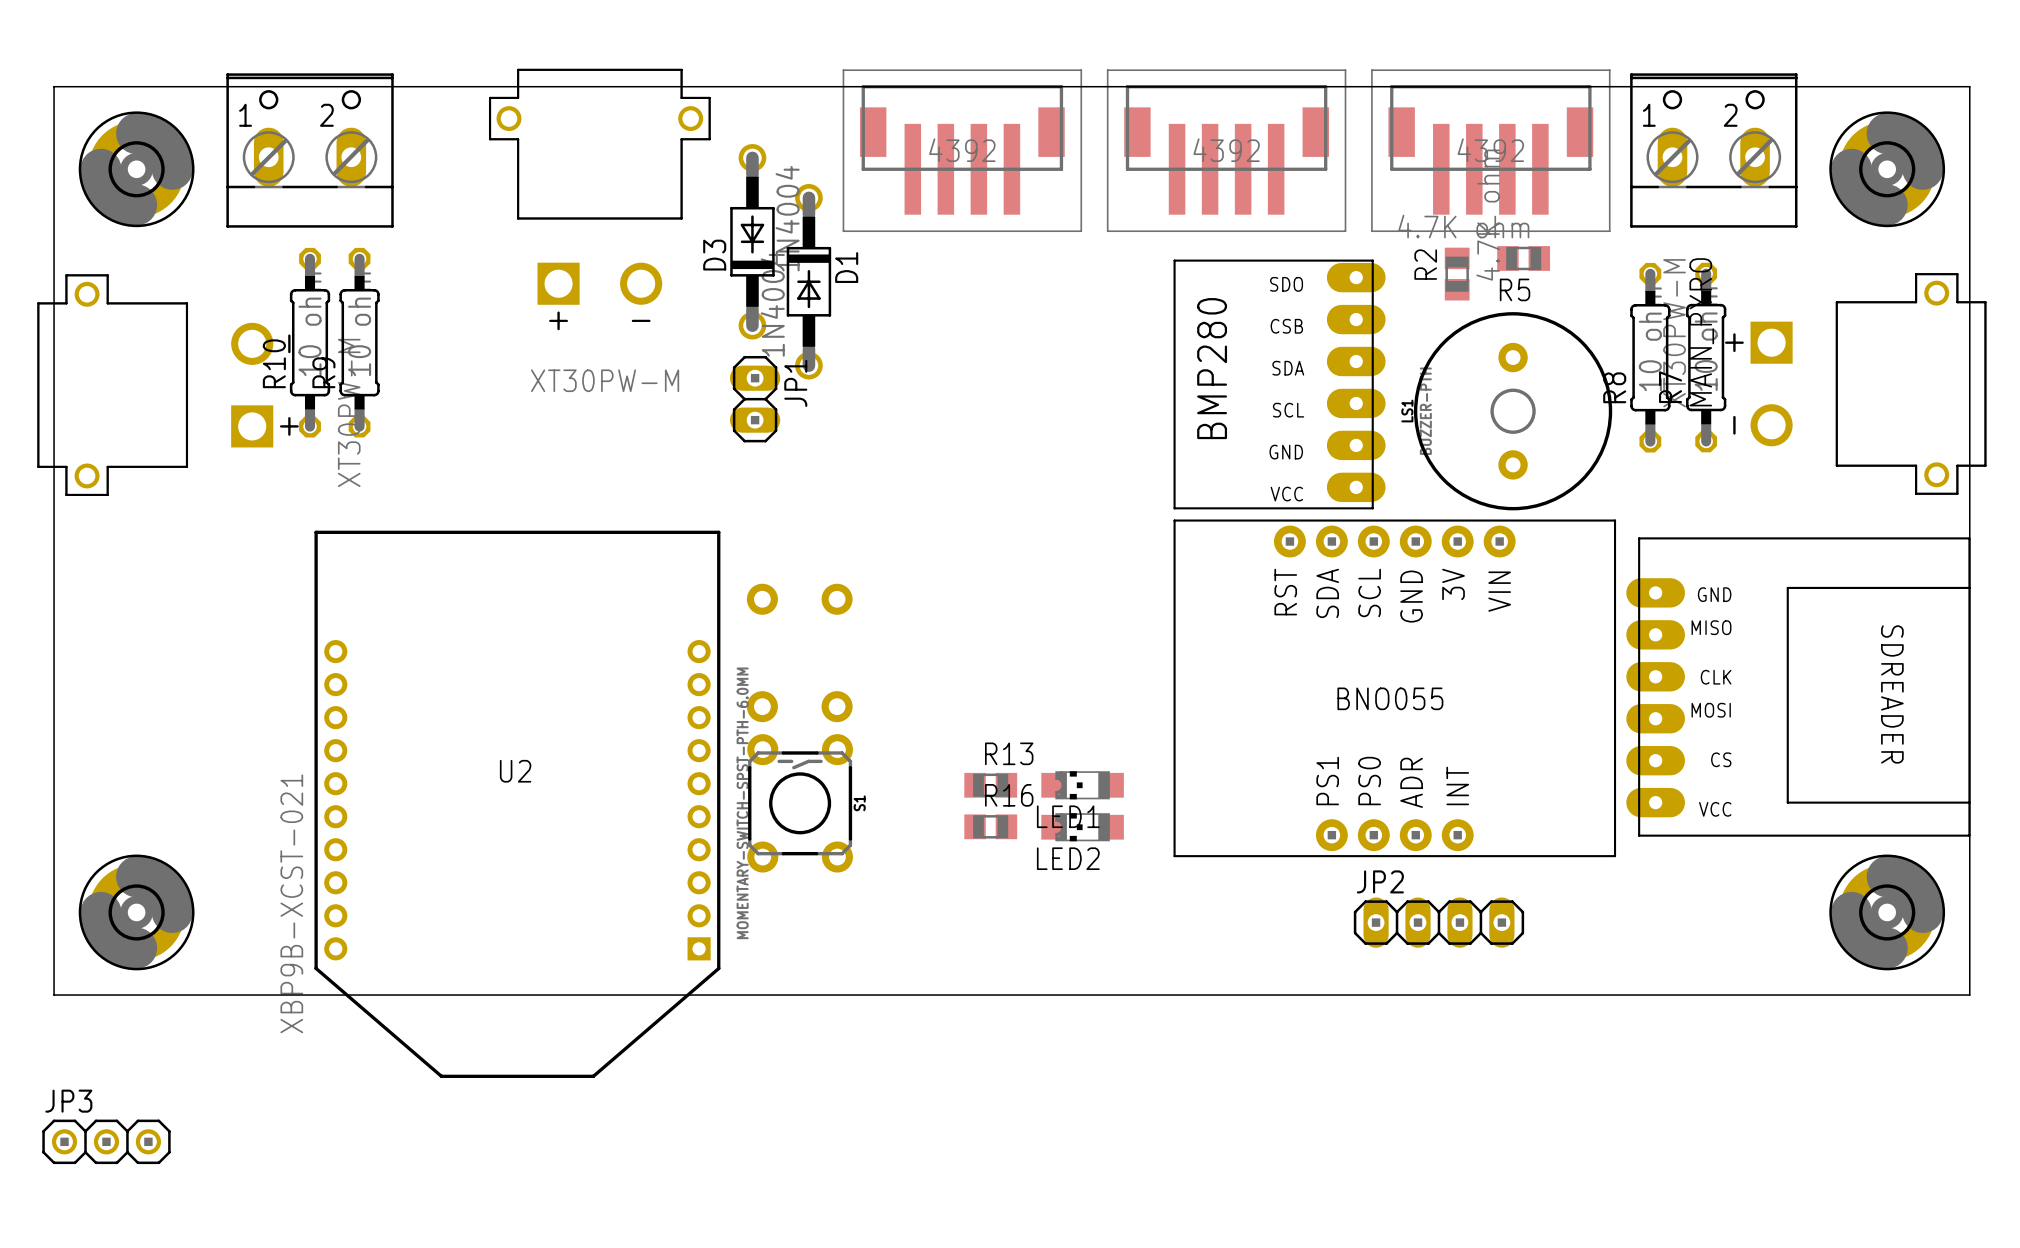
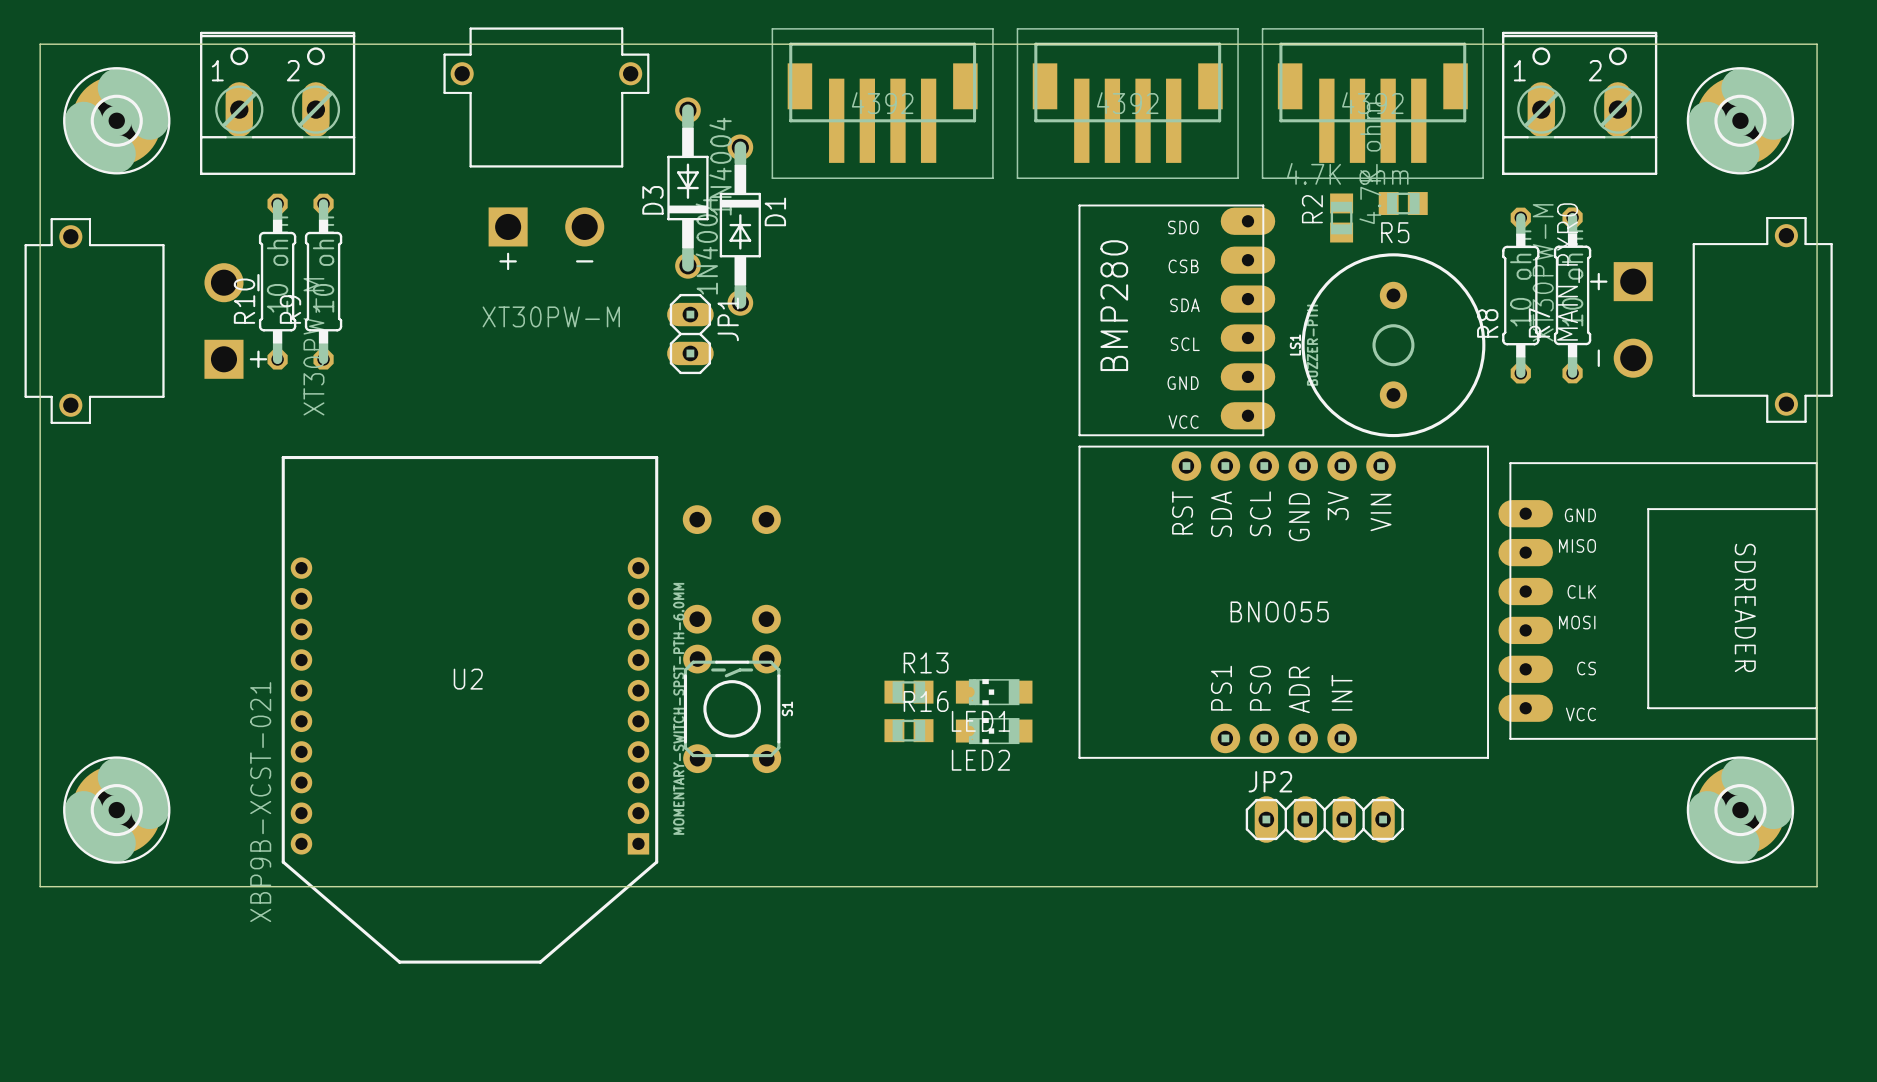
JP3: (106, 1141) -> none

